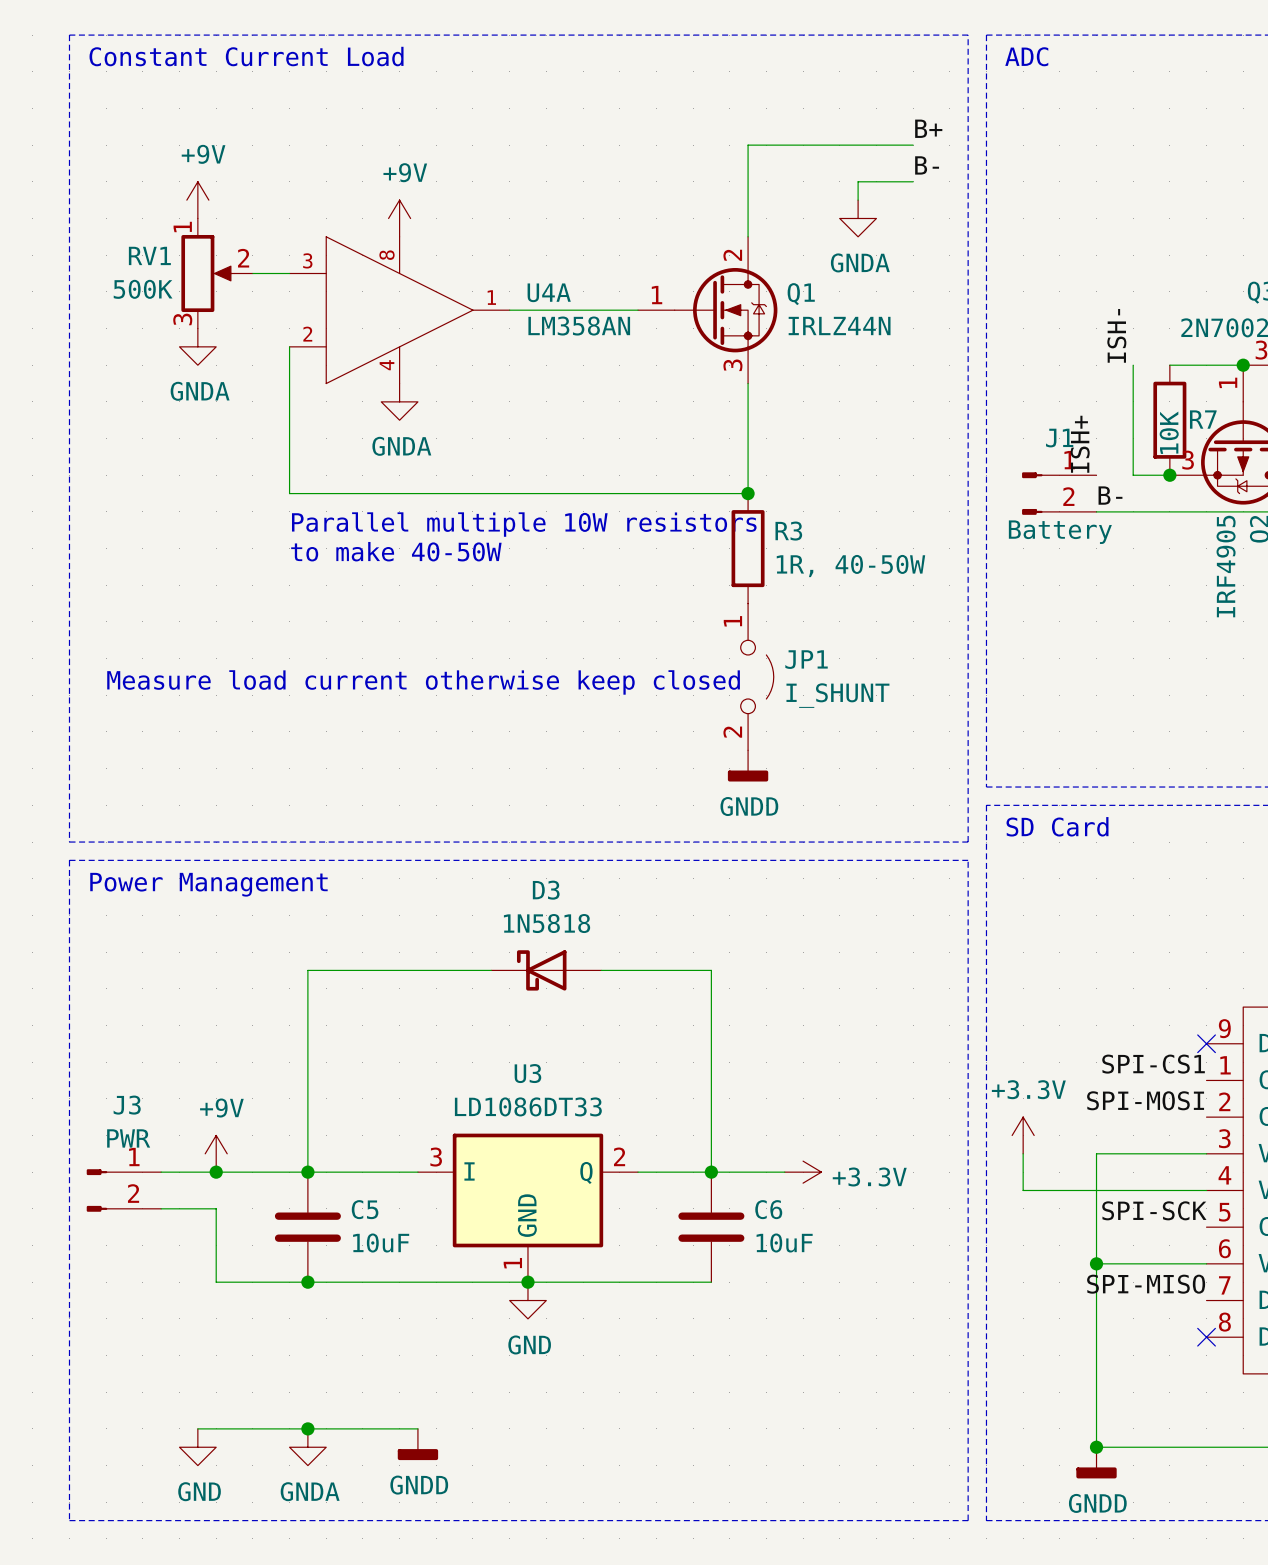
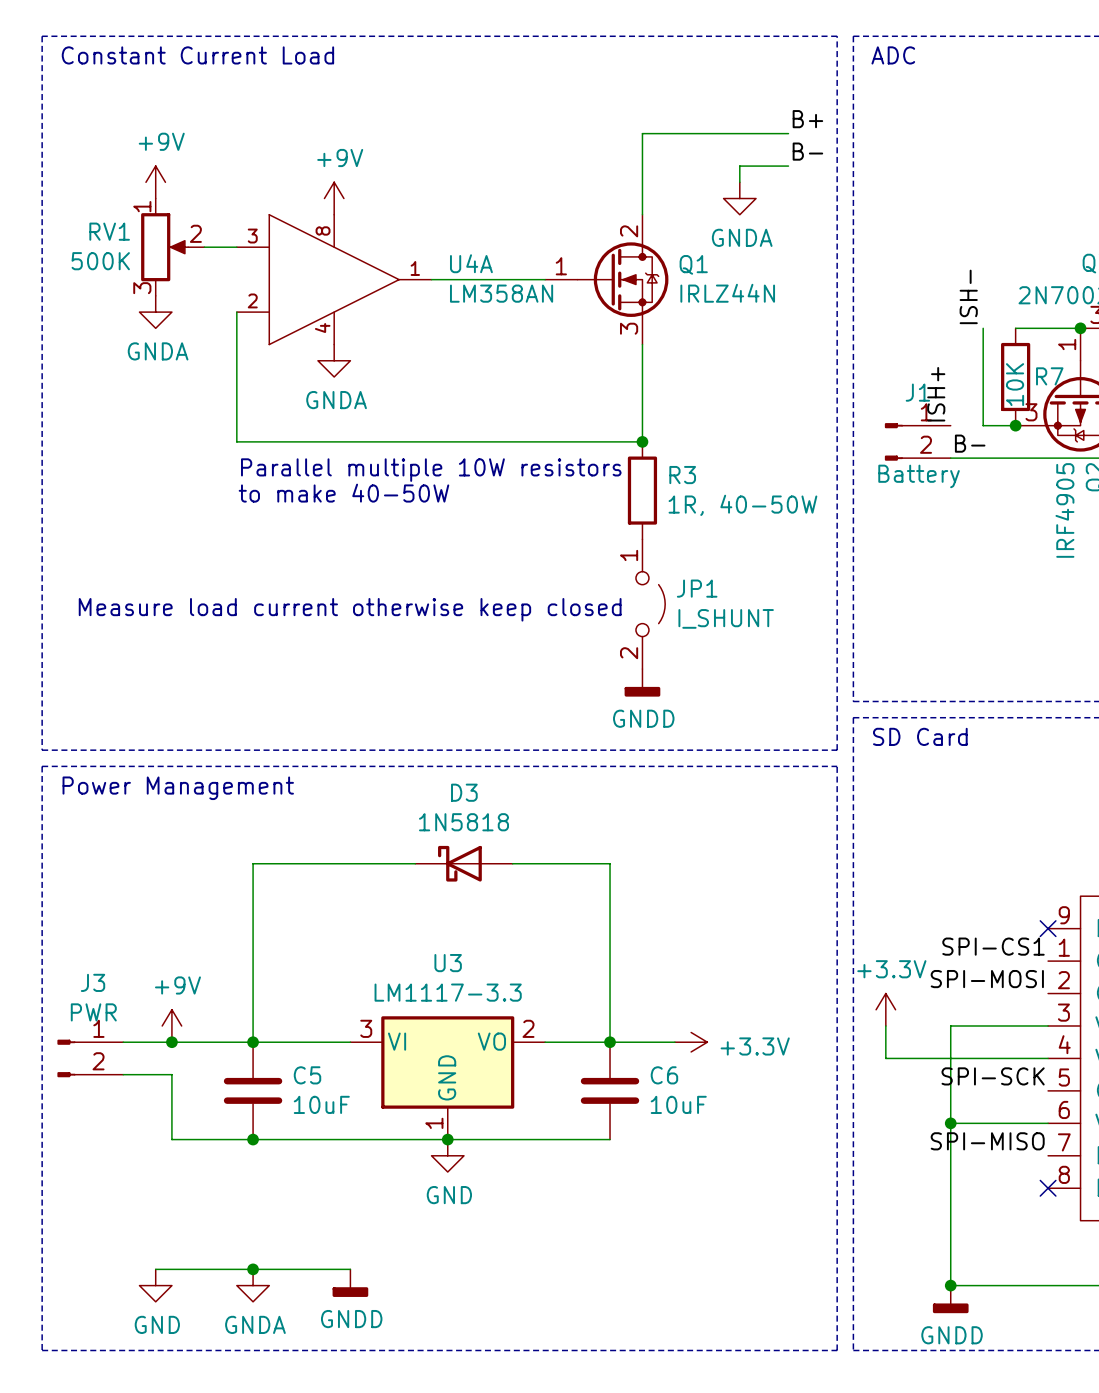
U3 value: LD1086DT33 (528, 1106) -> LM1117-3.3 (448, 992)
U3 symbol: [417, 1133, 639, 1283] -> [350, 1016, 546, 1140]

